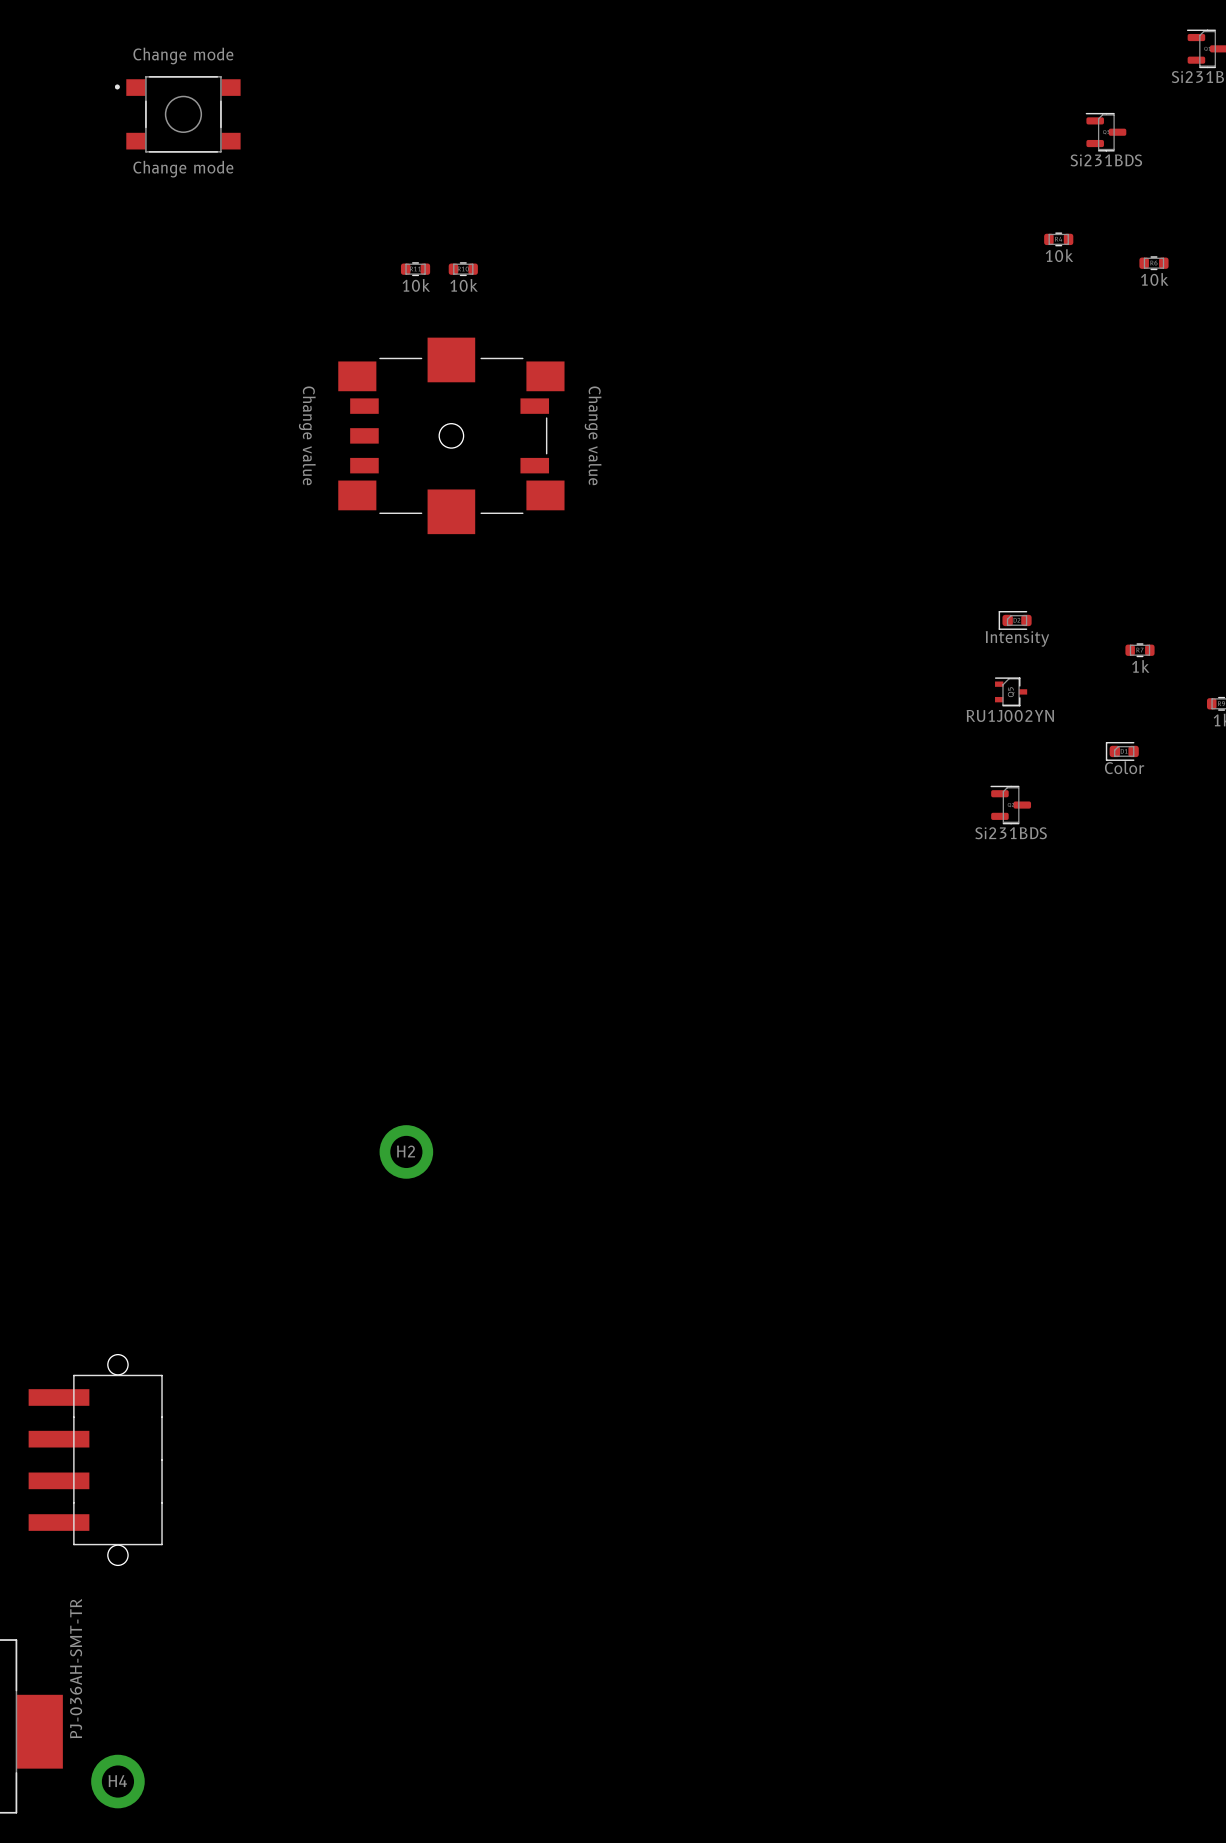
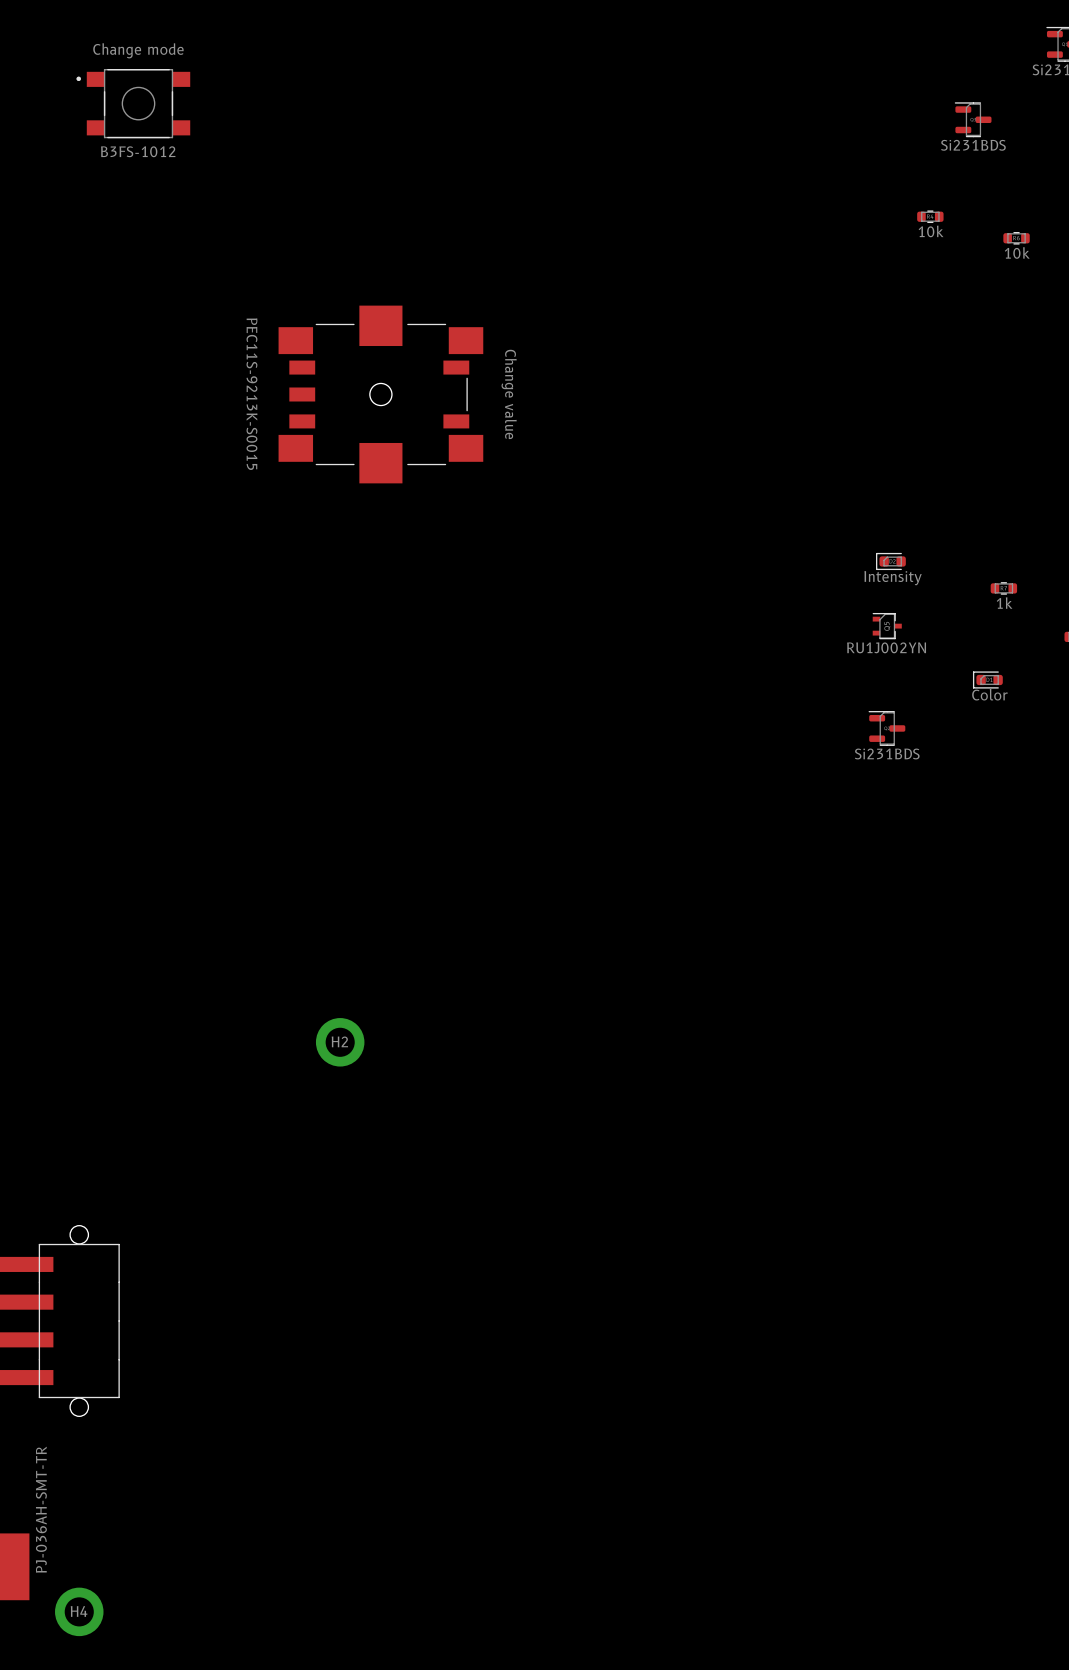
part value: Change mode (183, 169) -> B3FS-1012 (138, 151)
part: 10k (415, 269) -> none
part: 10k (463, 269) -> none
part value: Change value (307, 435) -> PEC11S-9213K-S0015 (251, 394)

